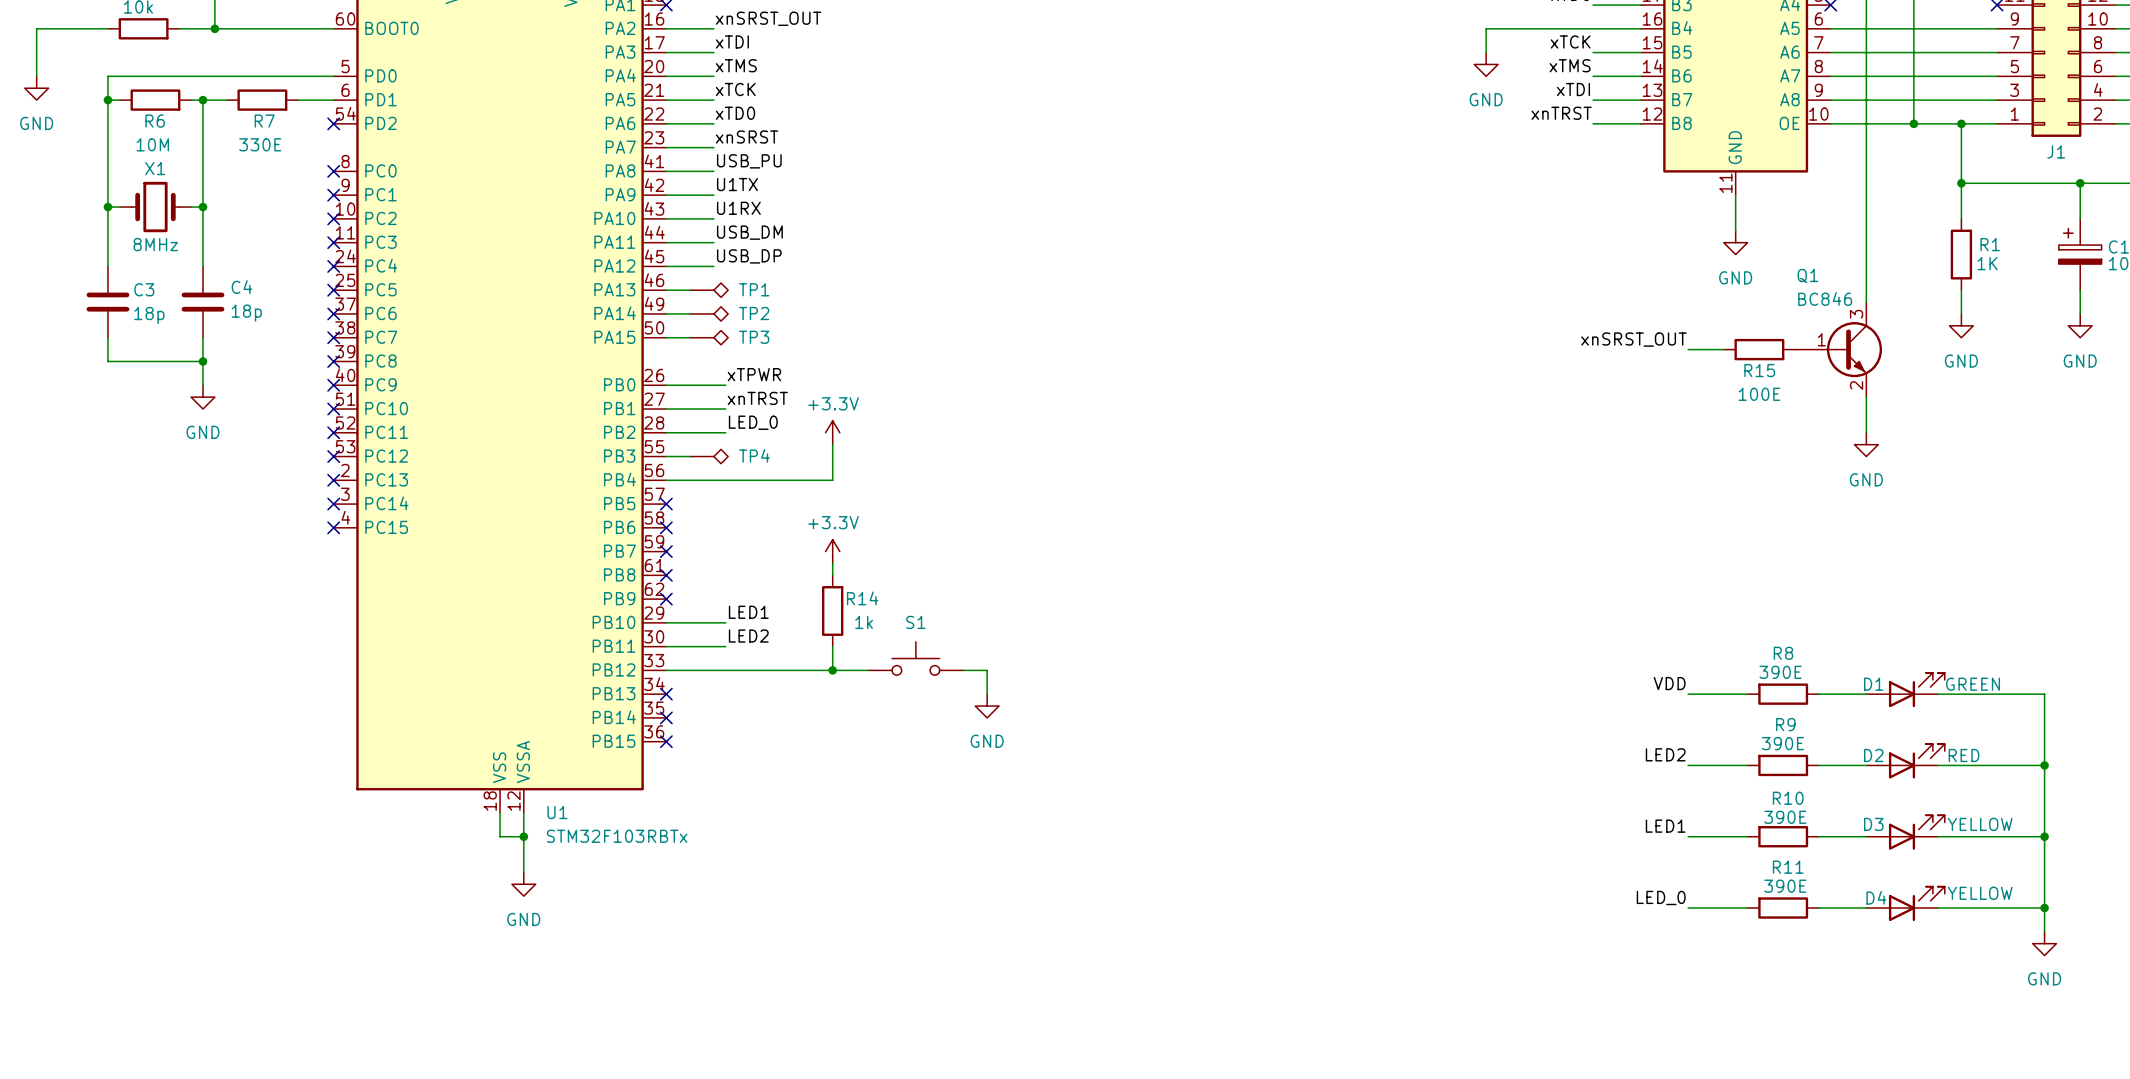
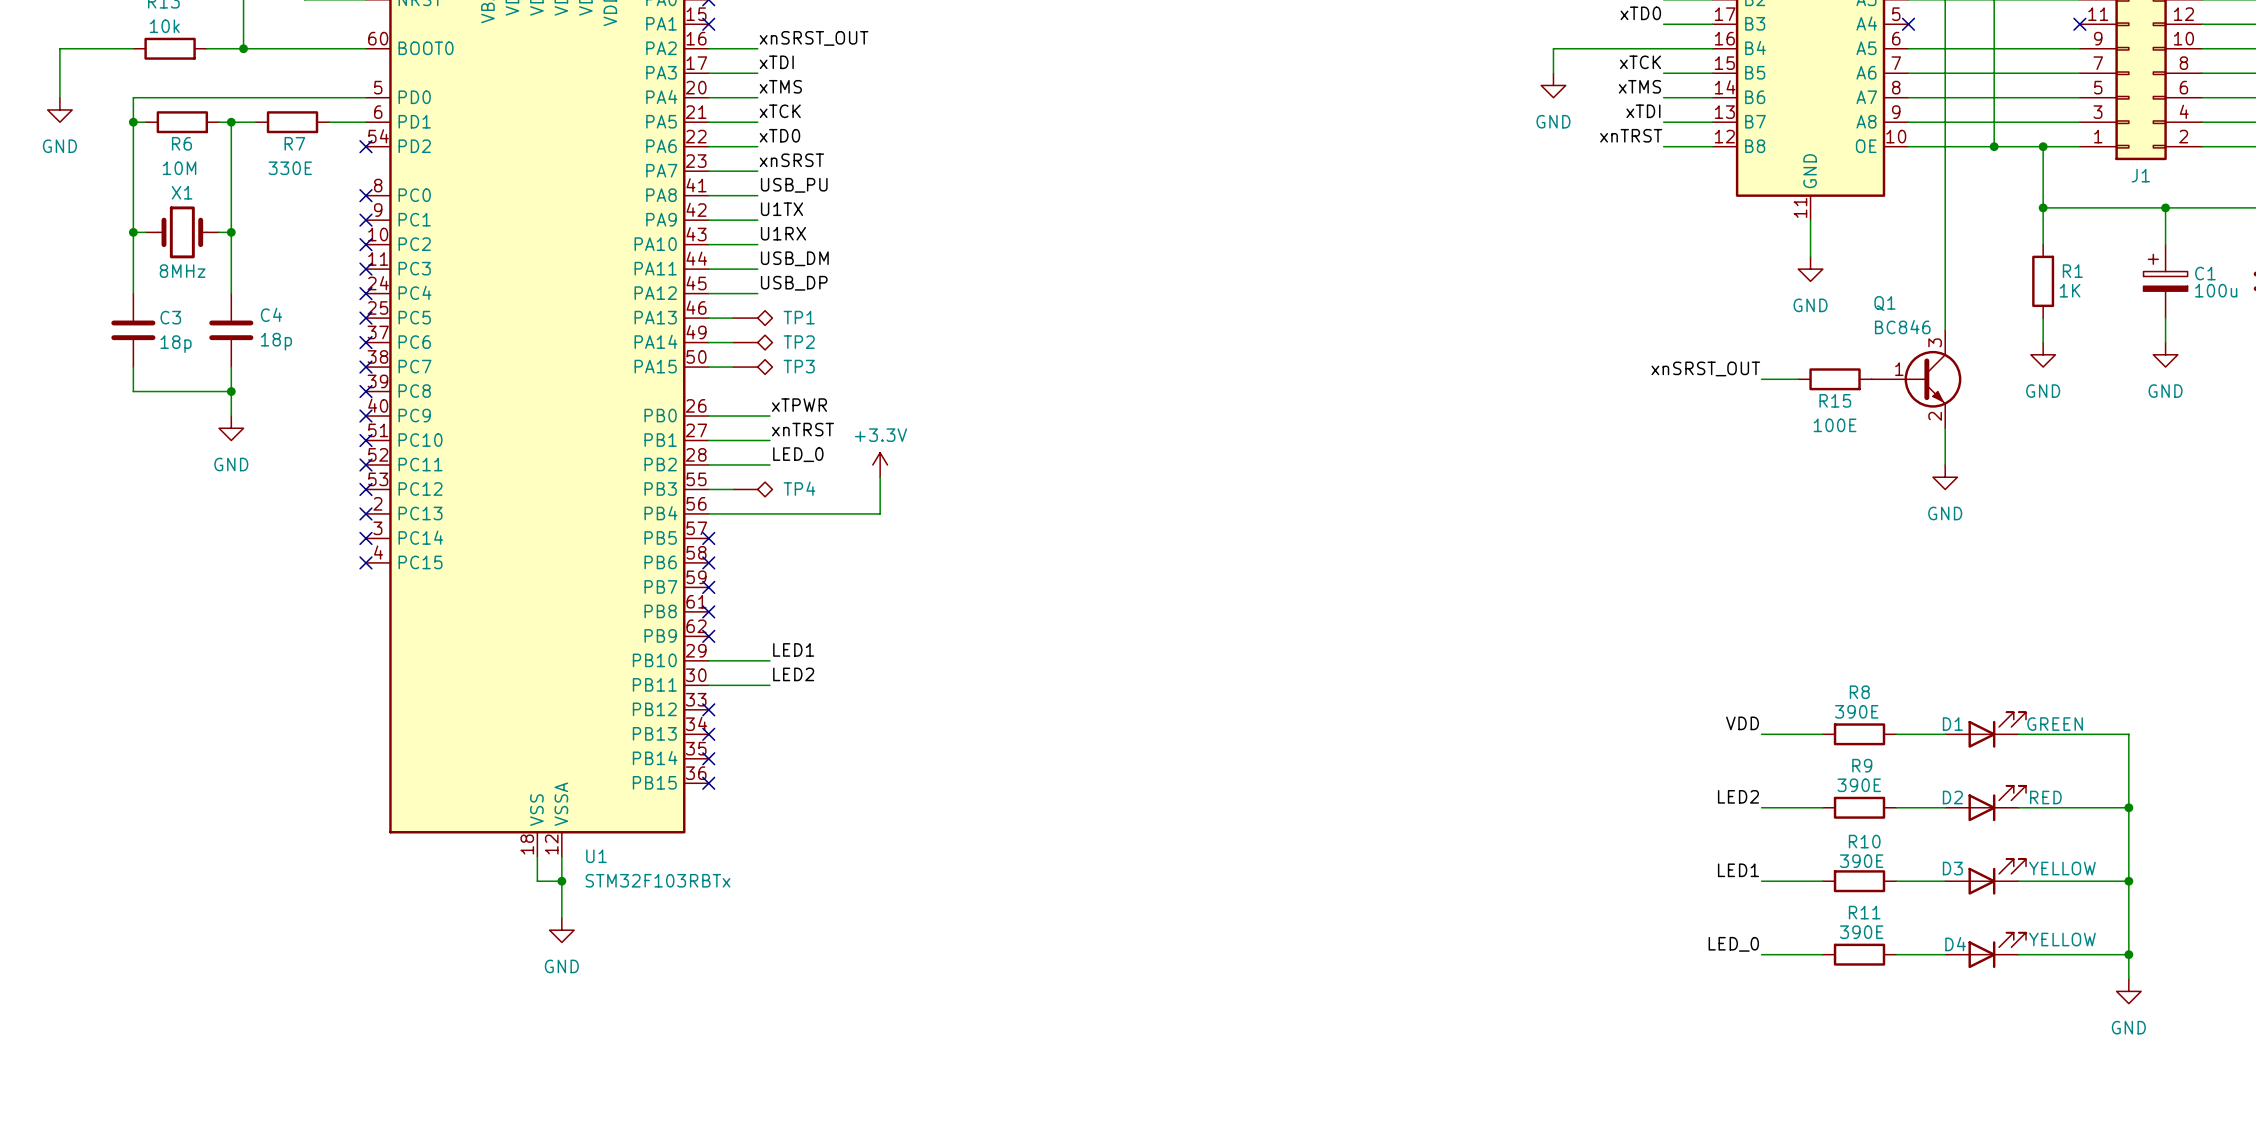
power symbol: +3.3V (832, 551) -> none
wire: (832, 563) (832, 575) -> none
R14: 1k (832, 610) -> none
wire: (832, 646) (832, 670) -> none
S1: (915, 658) -> none
wire: (666, 670) (868, 670) -> none
no-connect mark: none -> (708, 709)
junction: (832, 670) -> none
wire: (963, 670) (987, 670) (987, 694) -> none
power symbol: GND (987, 706) -> none

